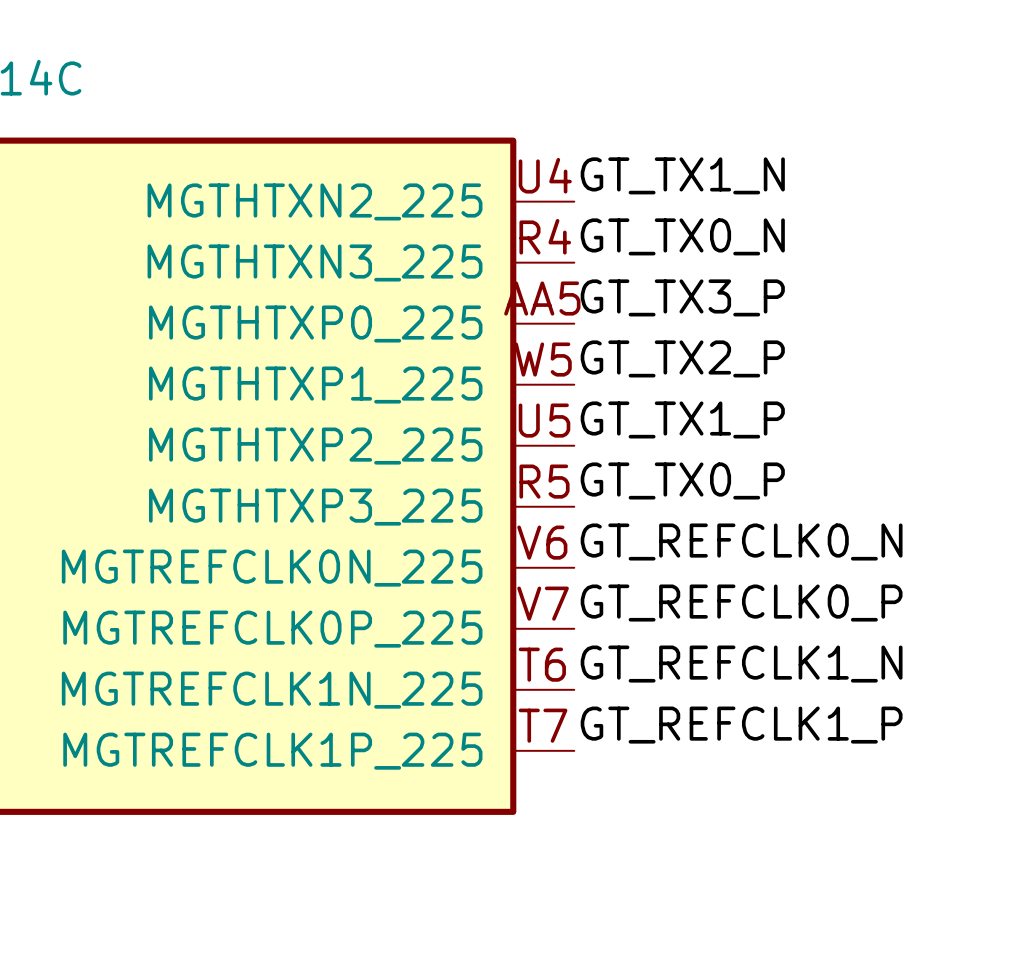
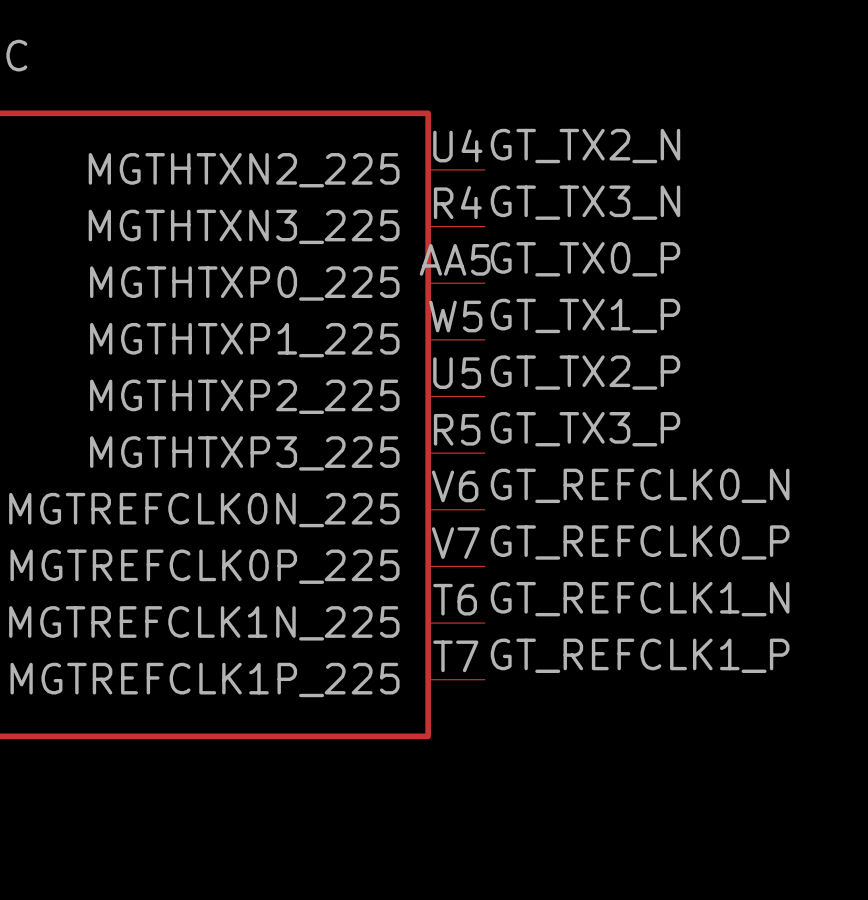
label: GT_TX1_N (682, 175) -> GT_TX2_N (585, 146)
label: GT_TX0_N (682, 236) -> GT_TX3_N (585, 202)
label: GT_TX3_P (682, 297) -> GT_TX0_P (585, 259)
label: GT_TX2_P (682, 358) -> GT_TX1_P (585, 315)
label: GT_TX1_P (682, 419) -> GT_TX2_P (585, 372)
label: GT_TX0_P (682, 480) -> GT_TX3_P (585, 429)

